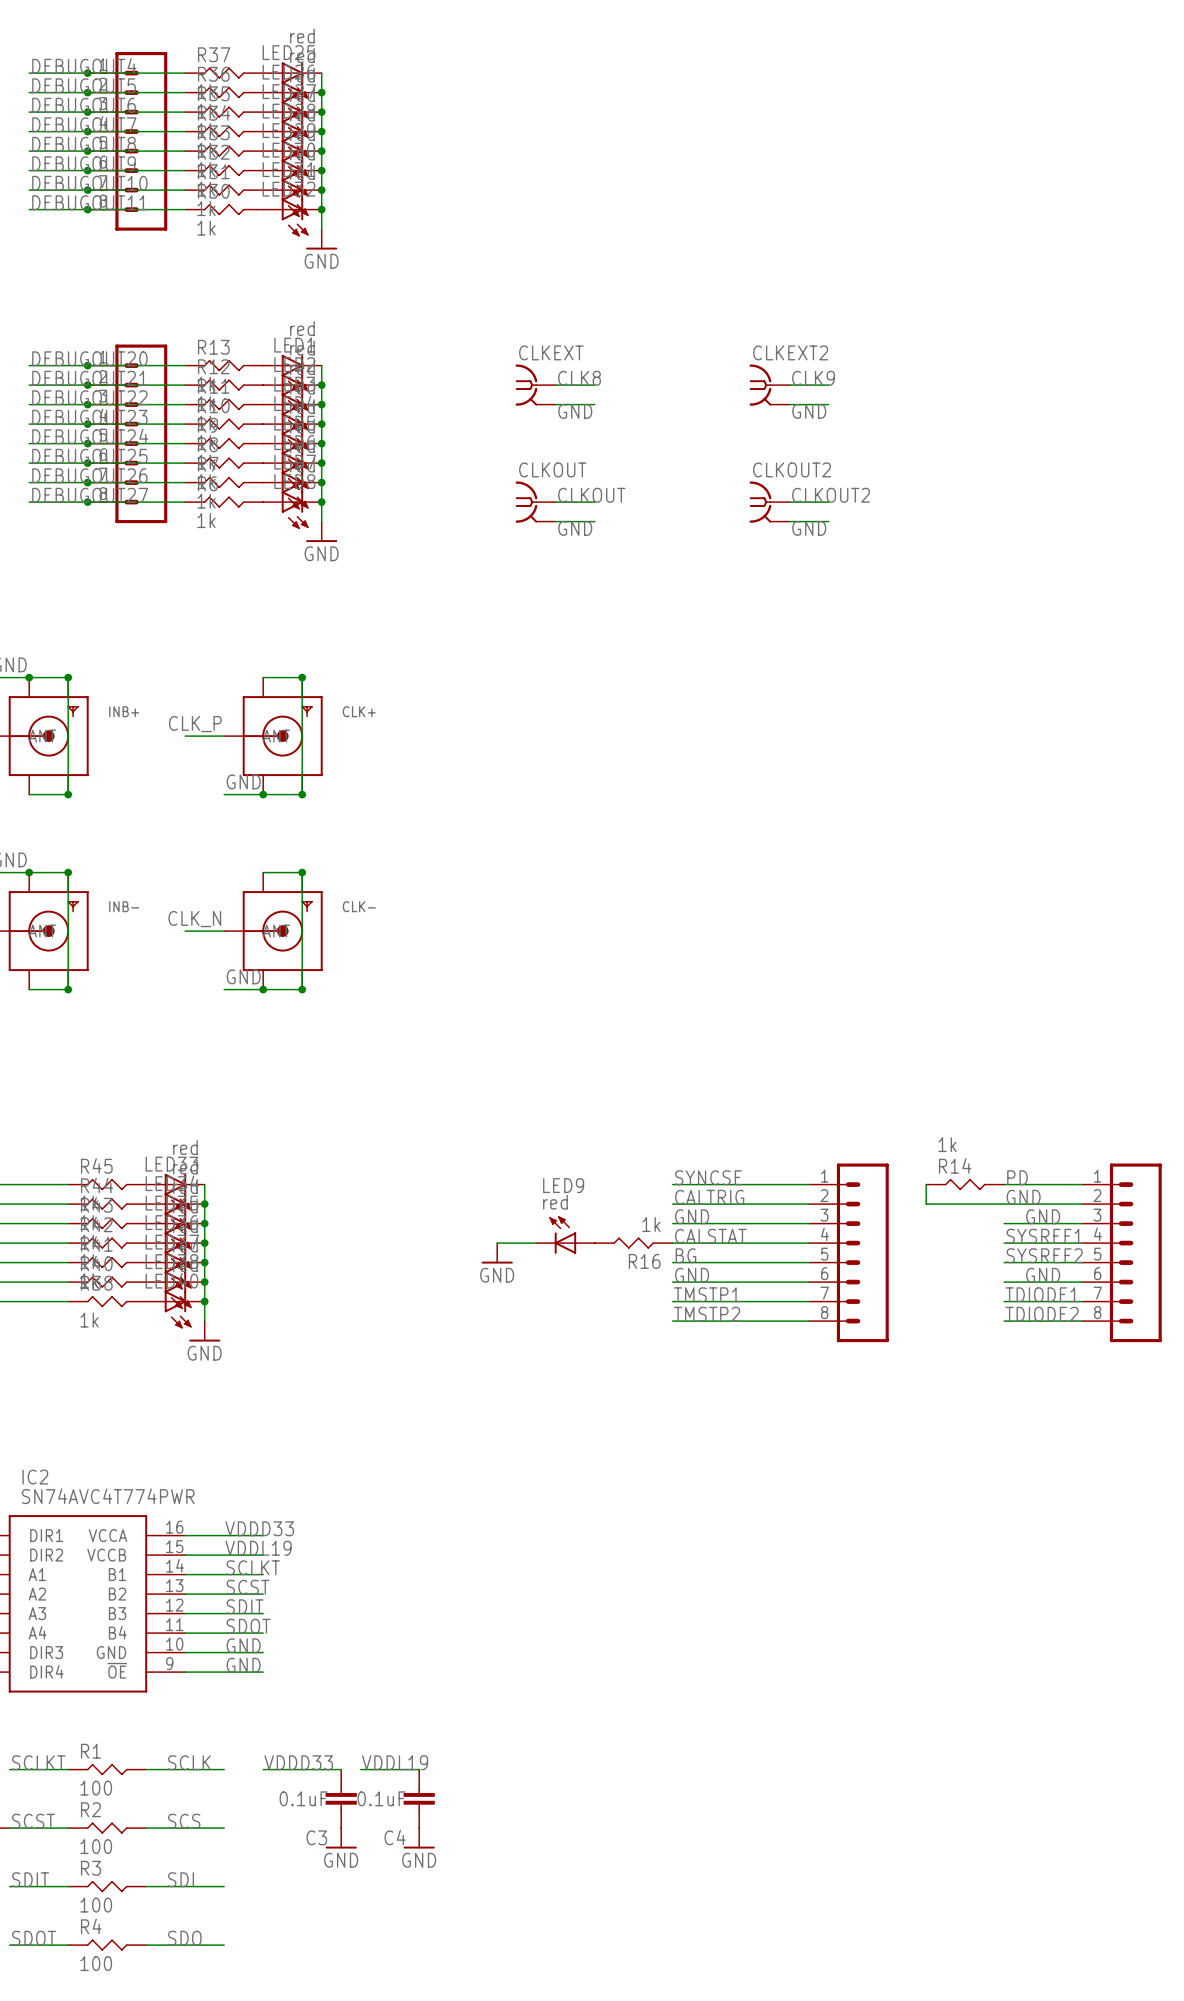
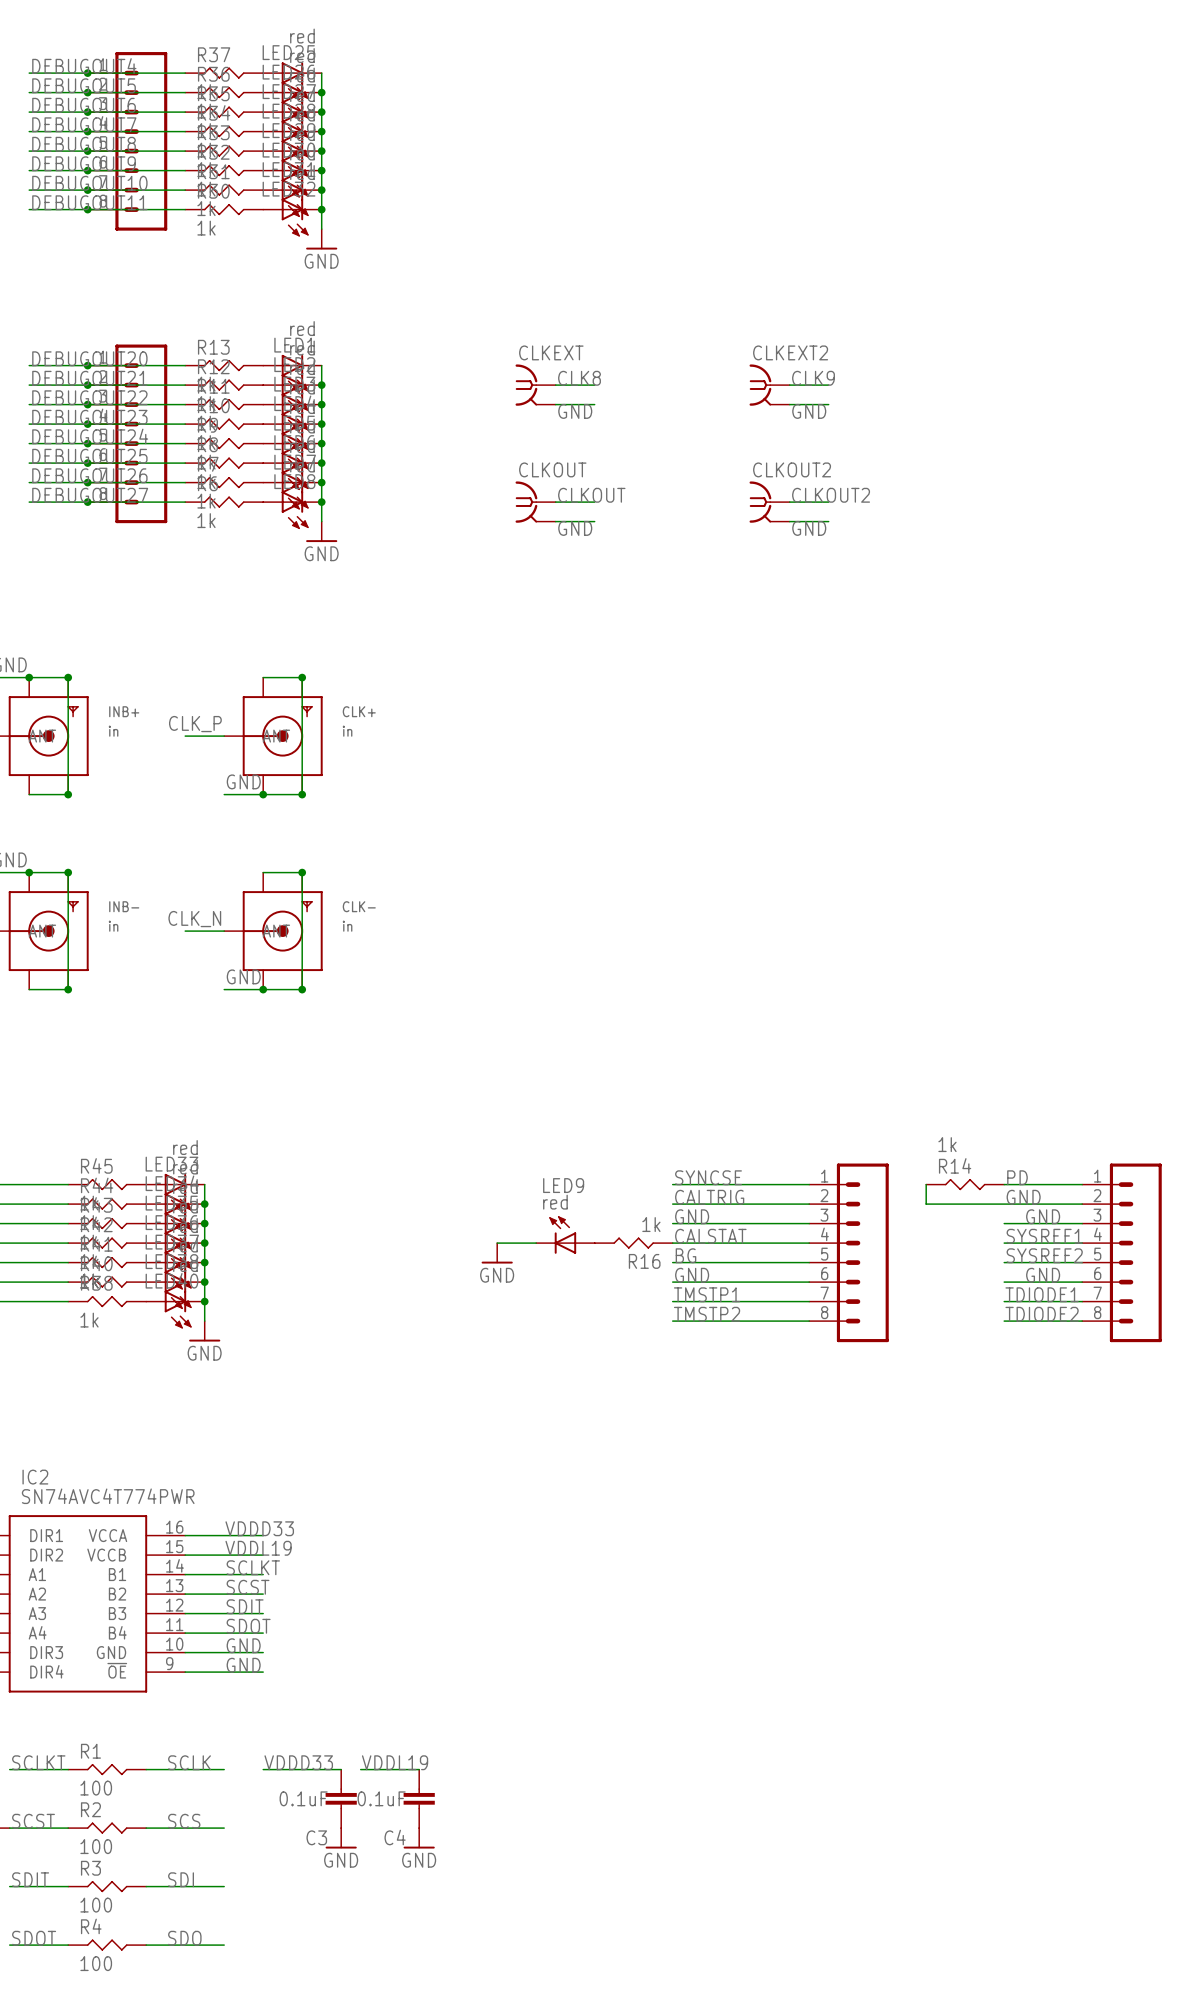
INB+ value: none -> in (113, 731)
CLK+ value: none -> in (347, 731)
INB- value: none -> in (113, 926)
CLK- value: none -> in (347, 926)

